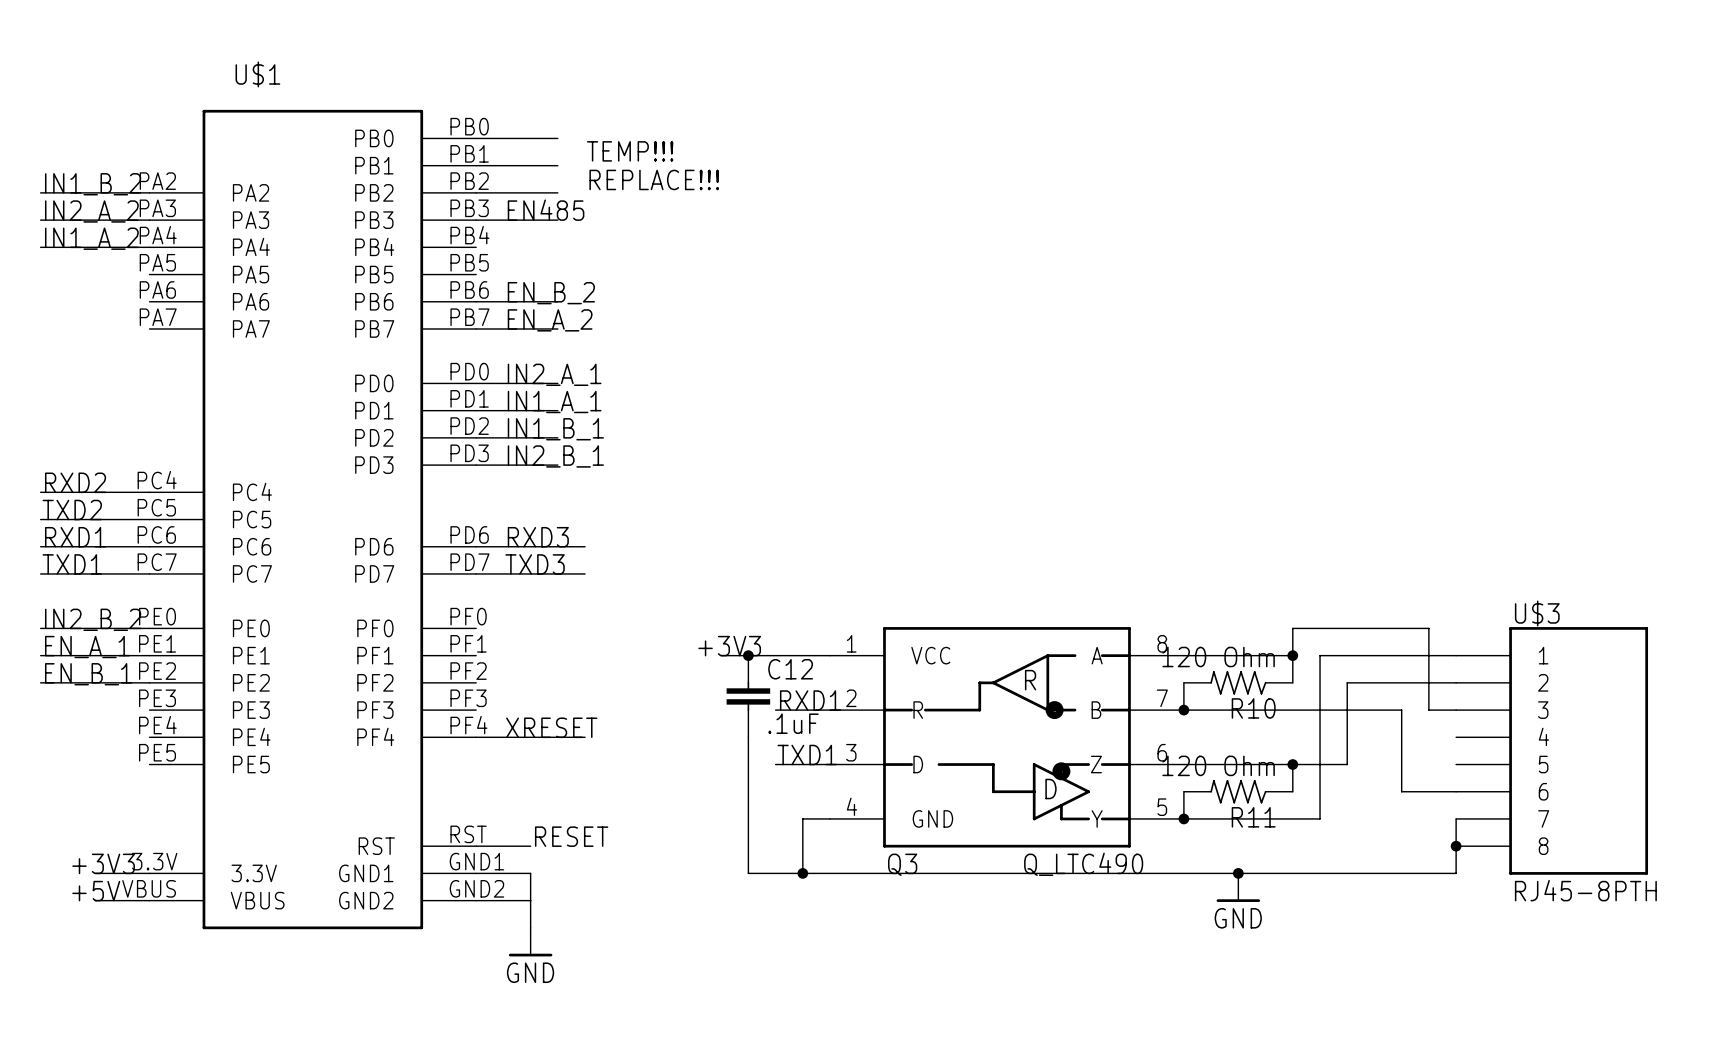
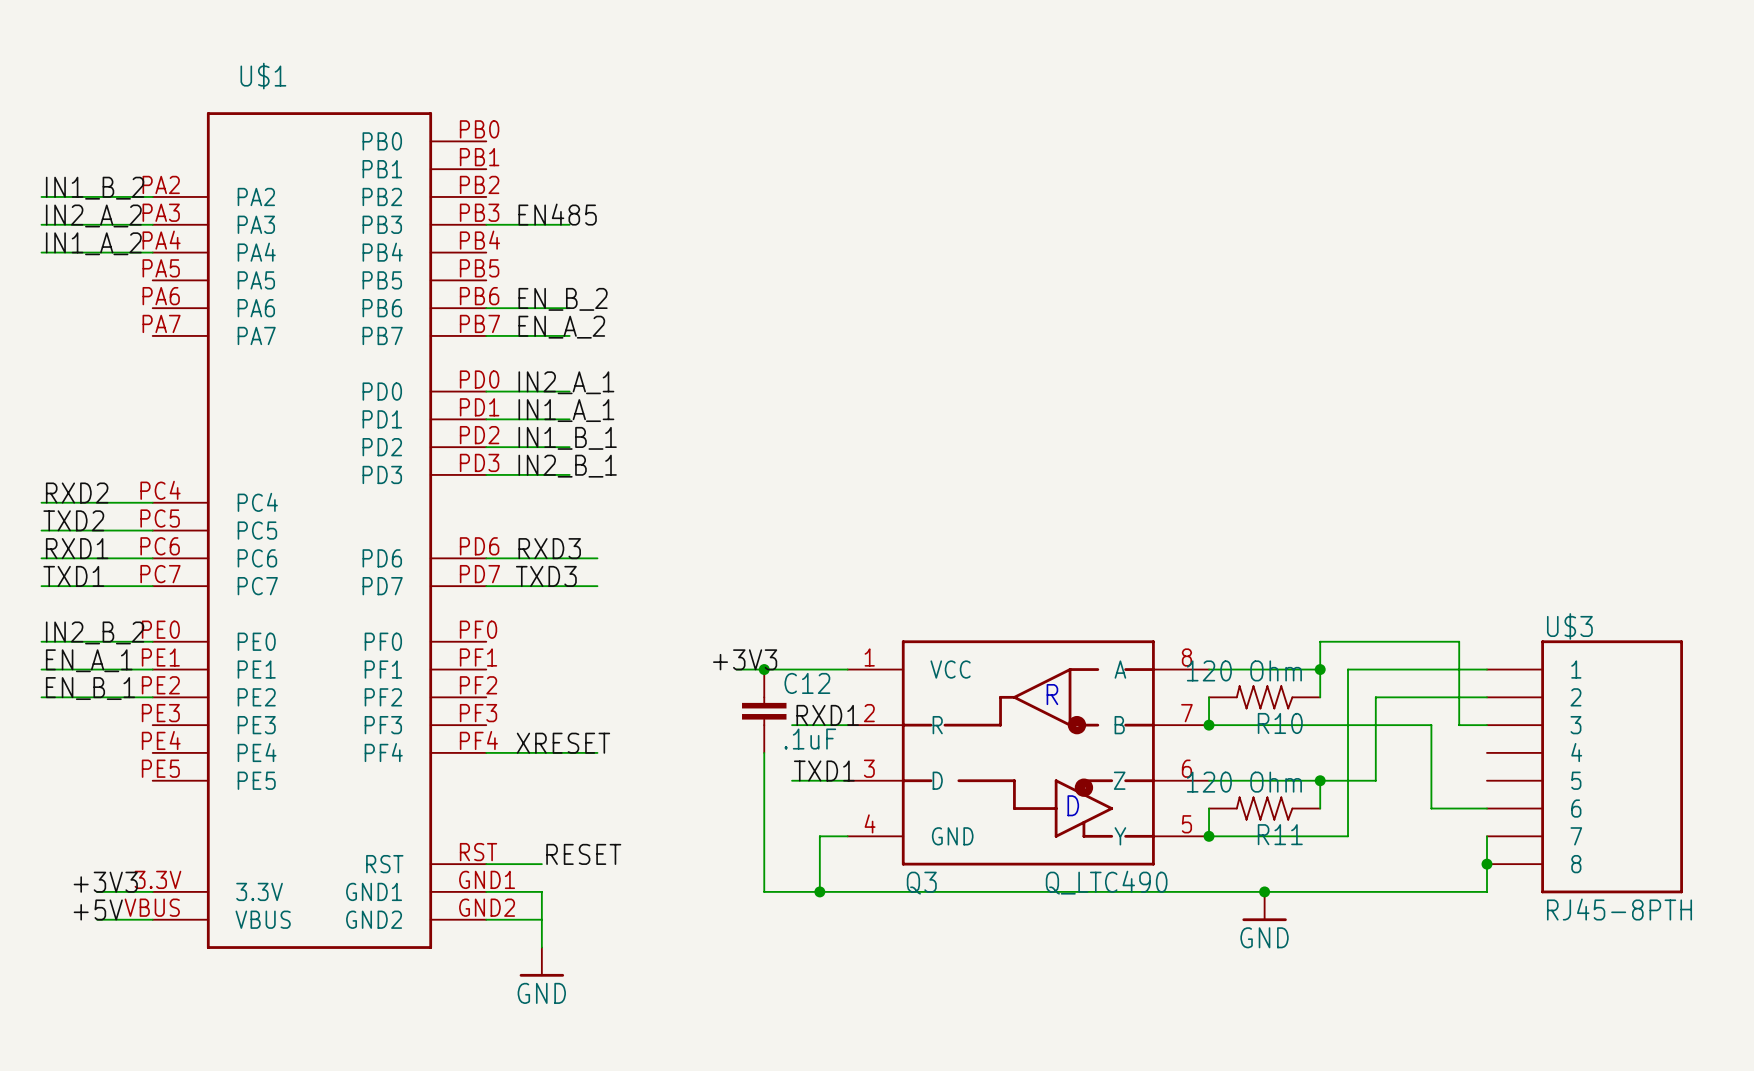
wire: (476, 138) (557, 138) -> none
text: TEMP!!! (630, 151) -> none
wire: (476, 165) (557, 165) -> none
text: REPLACE!!! (654, 179) -> none
wire: (476, 192) (557, 192) -> none

